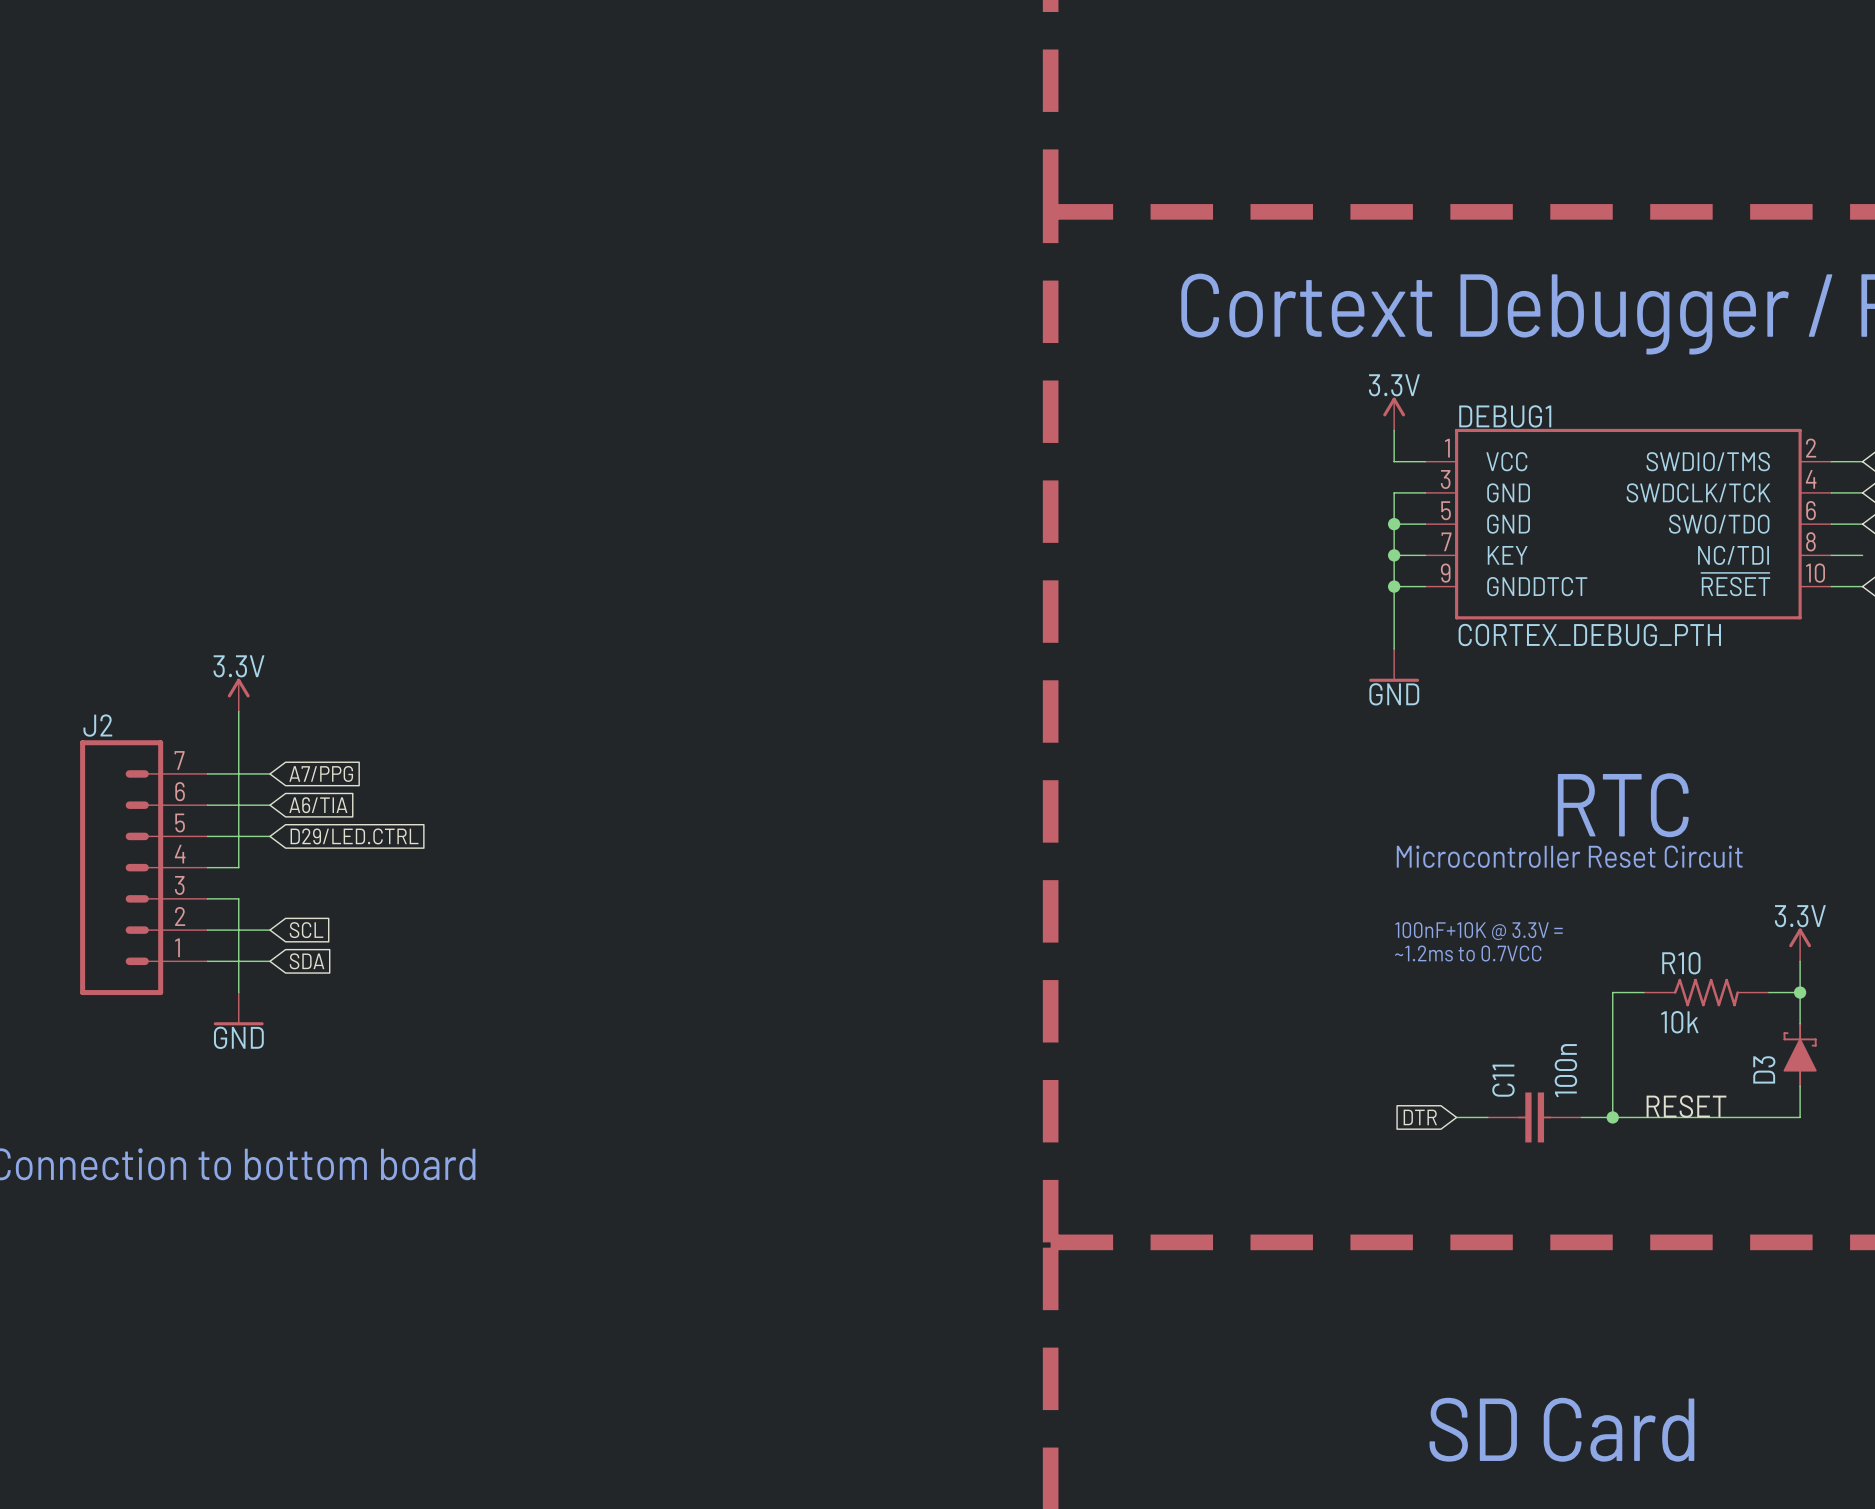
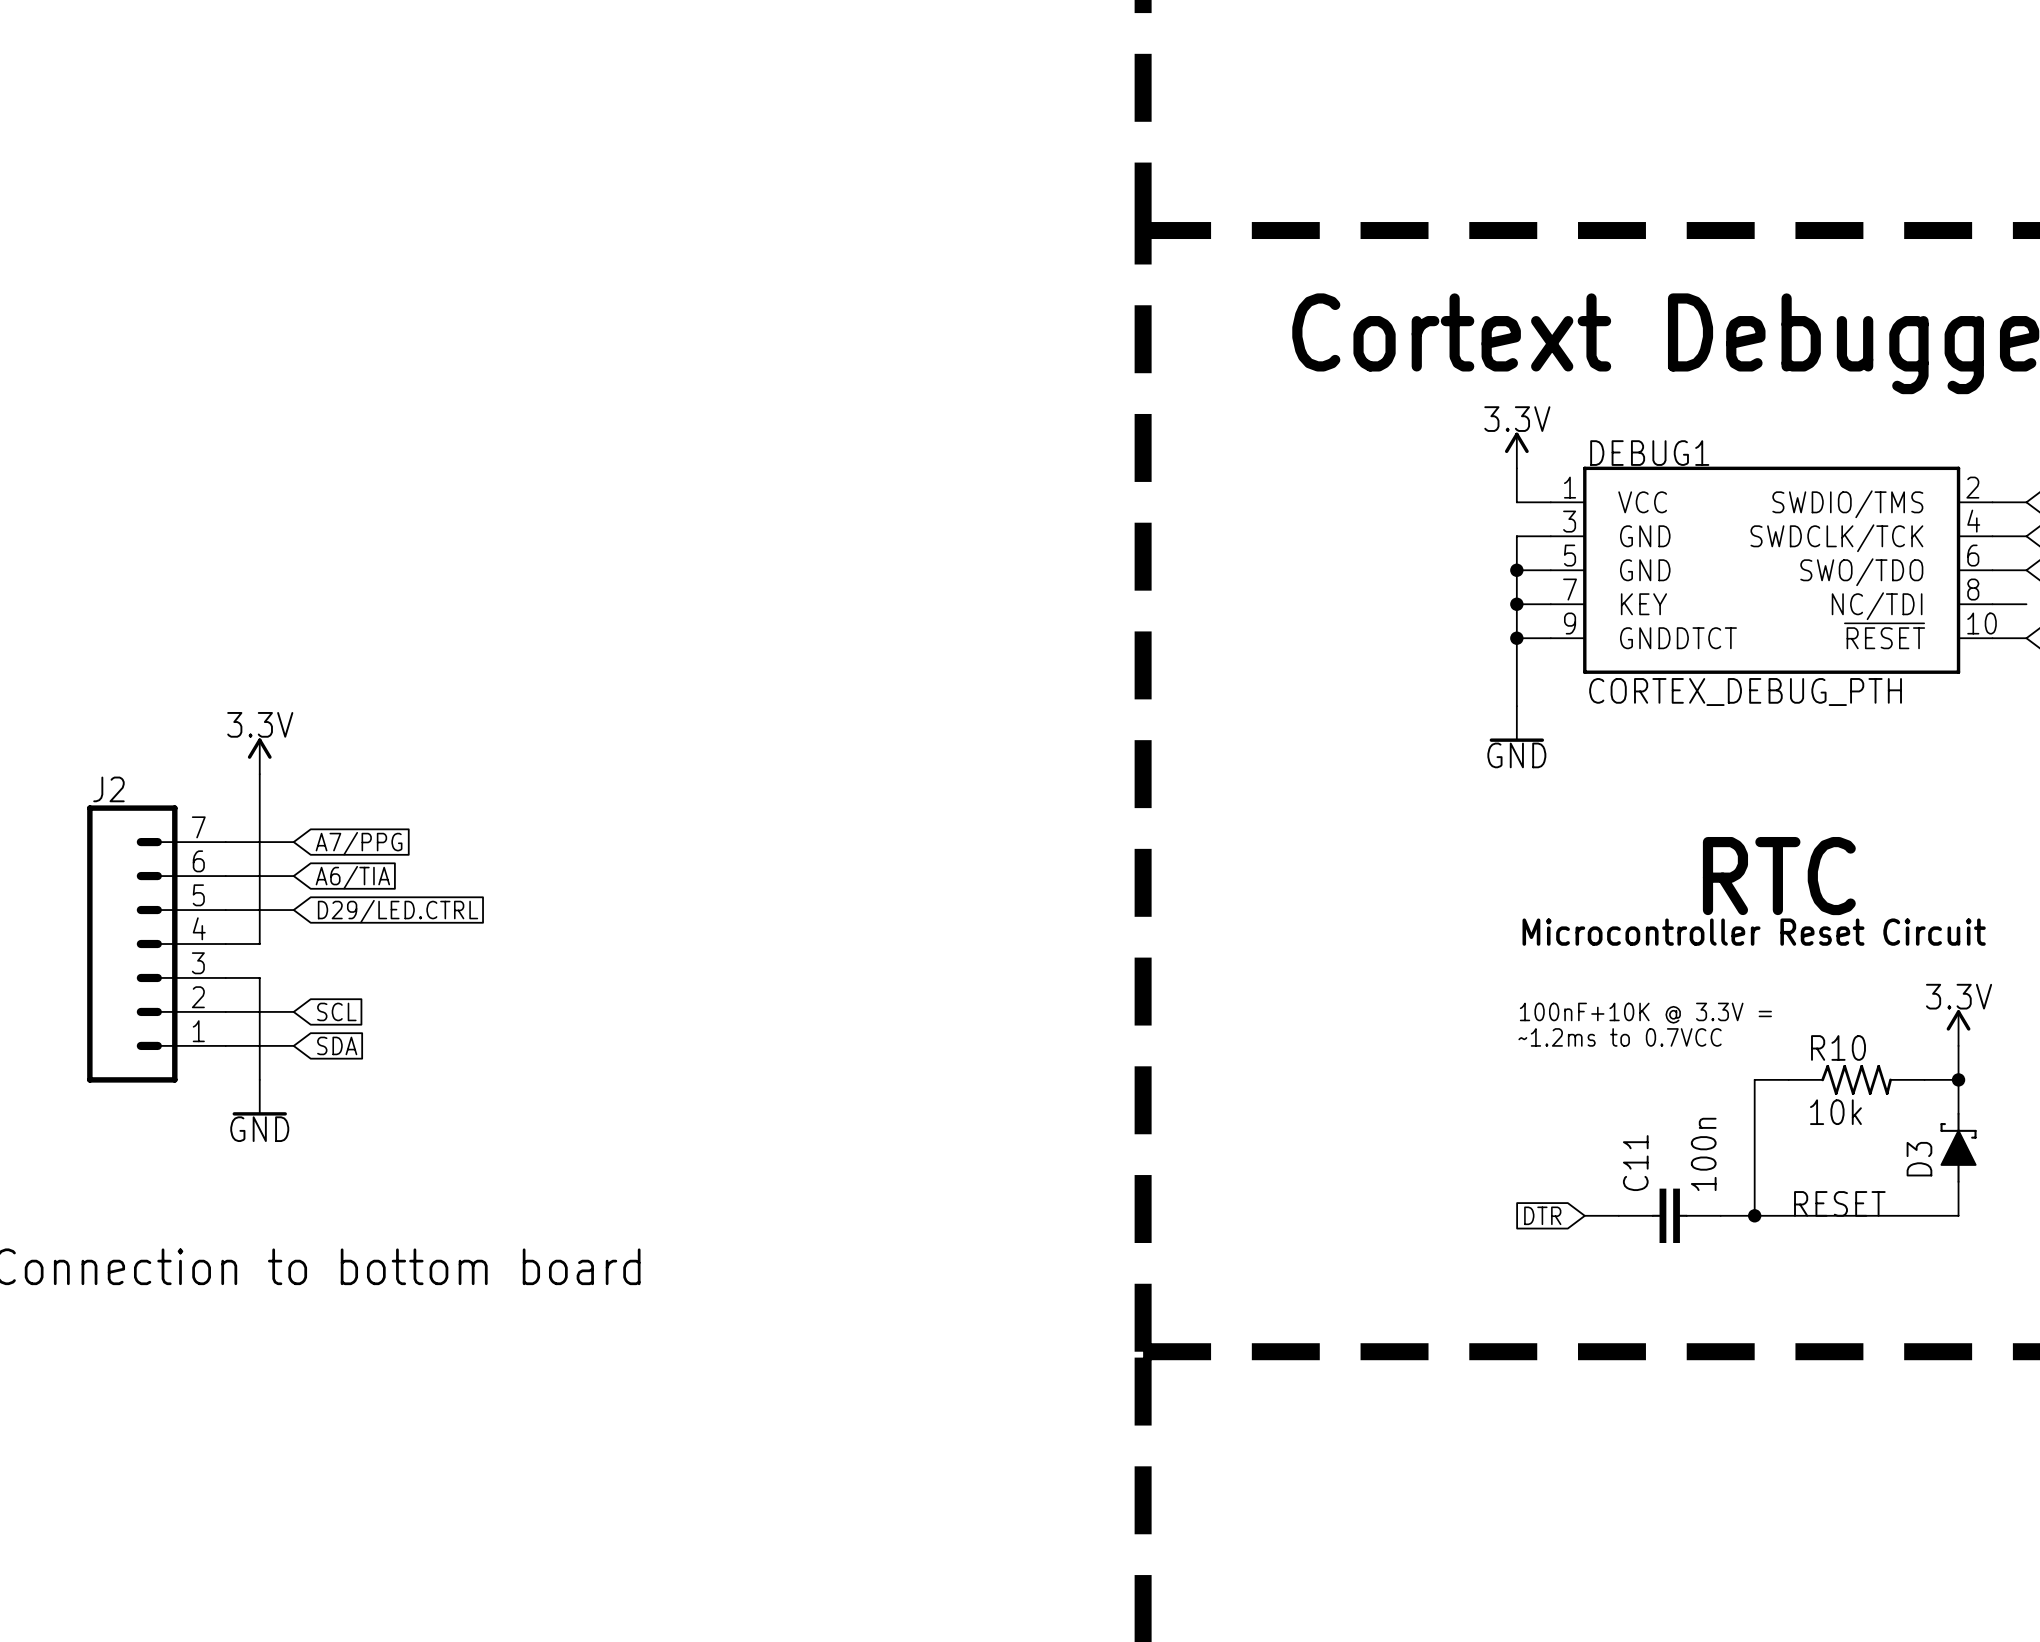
text: SD Card (1561, 1429) -> none

